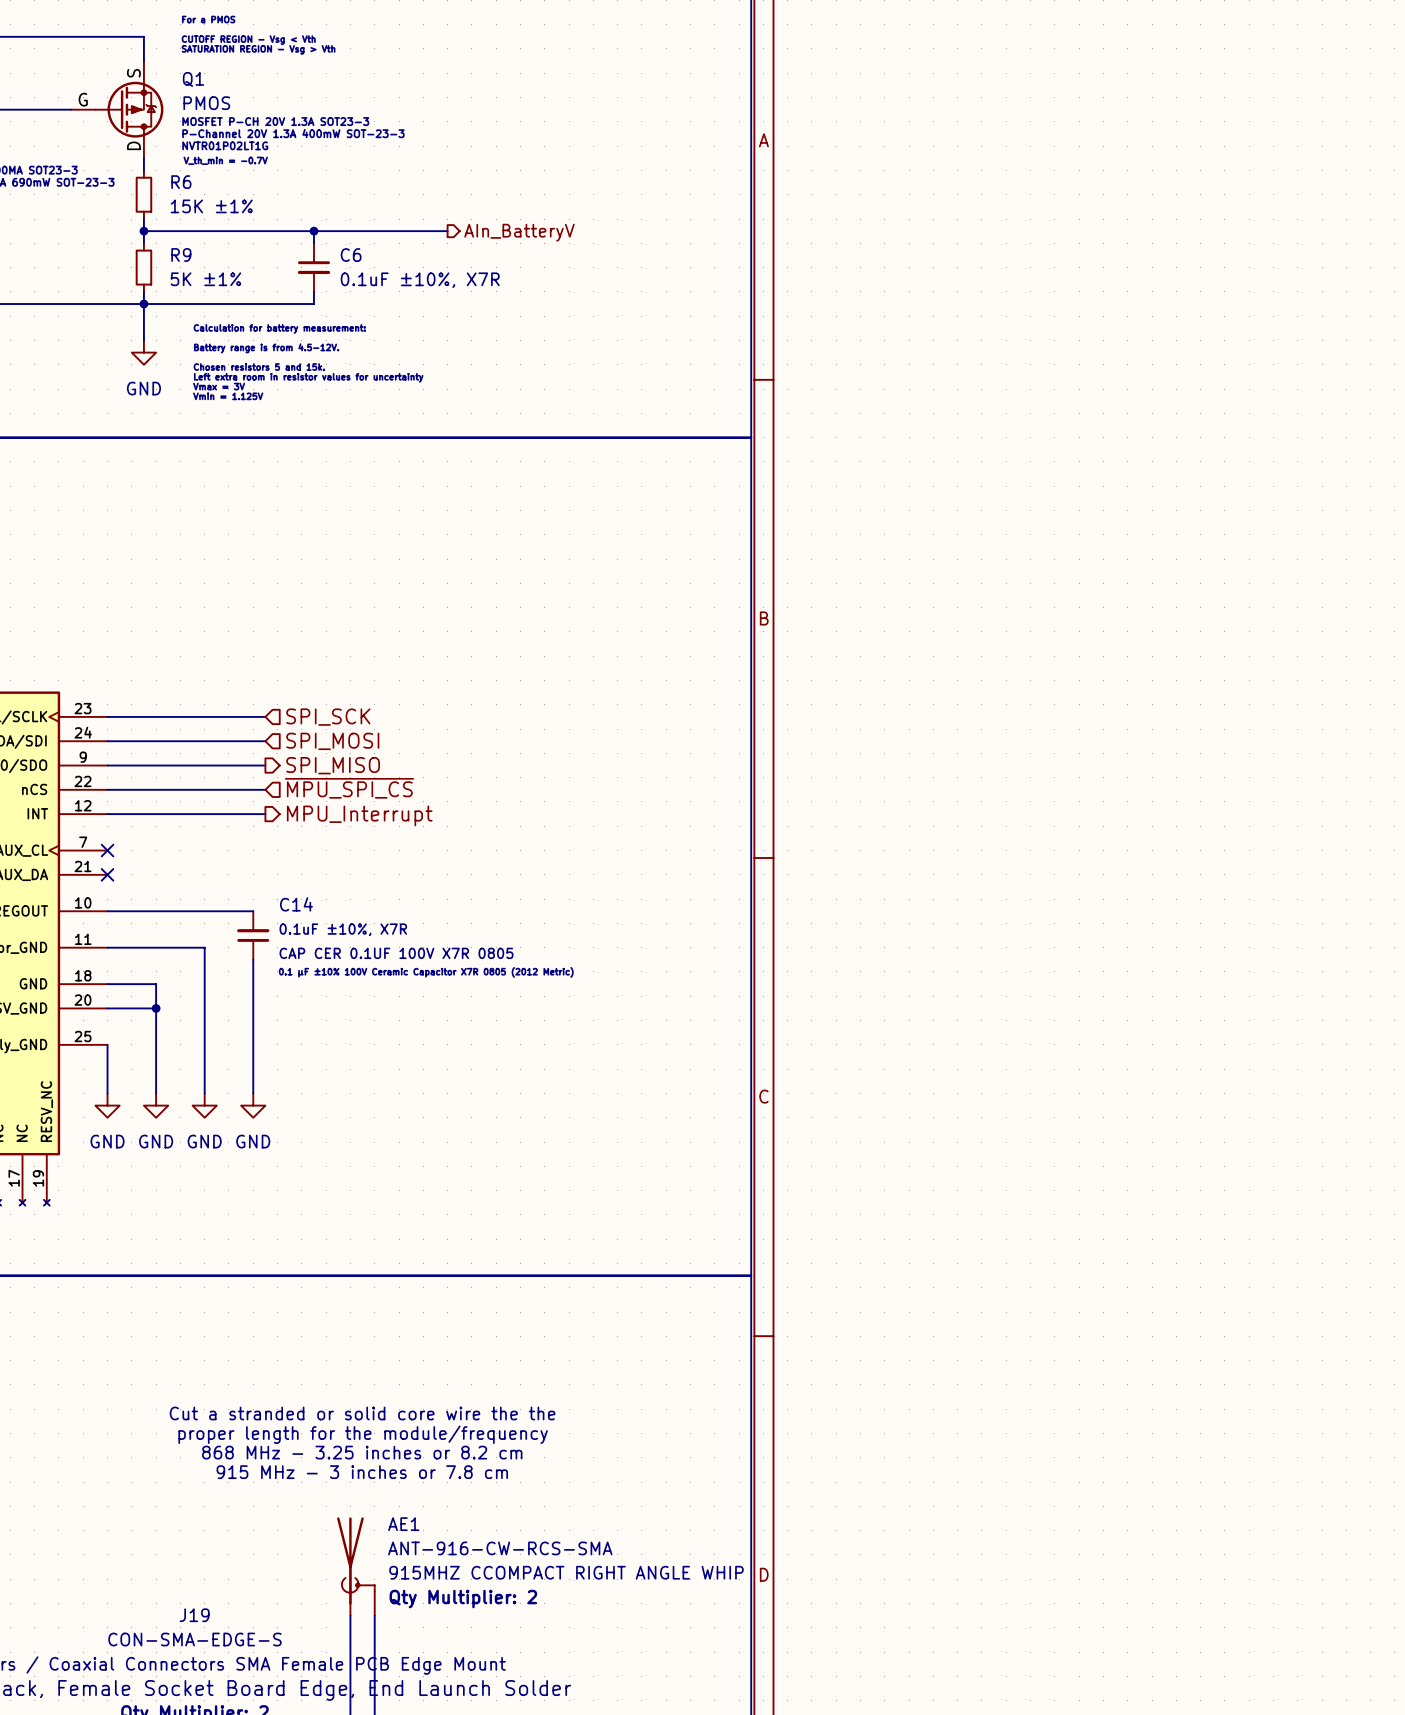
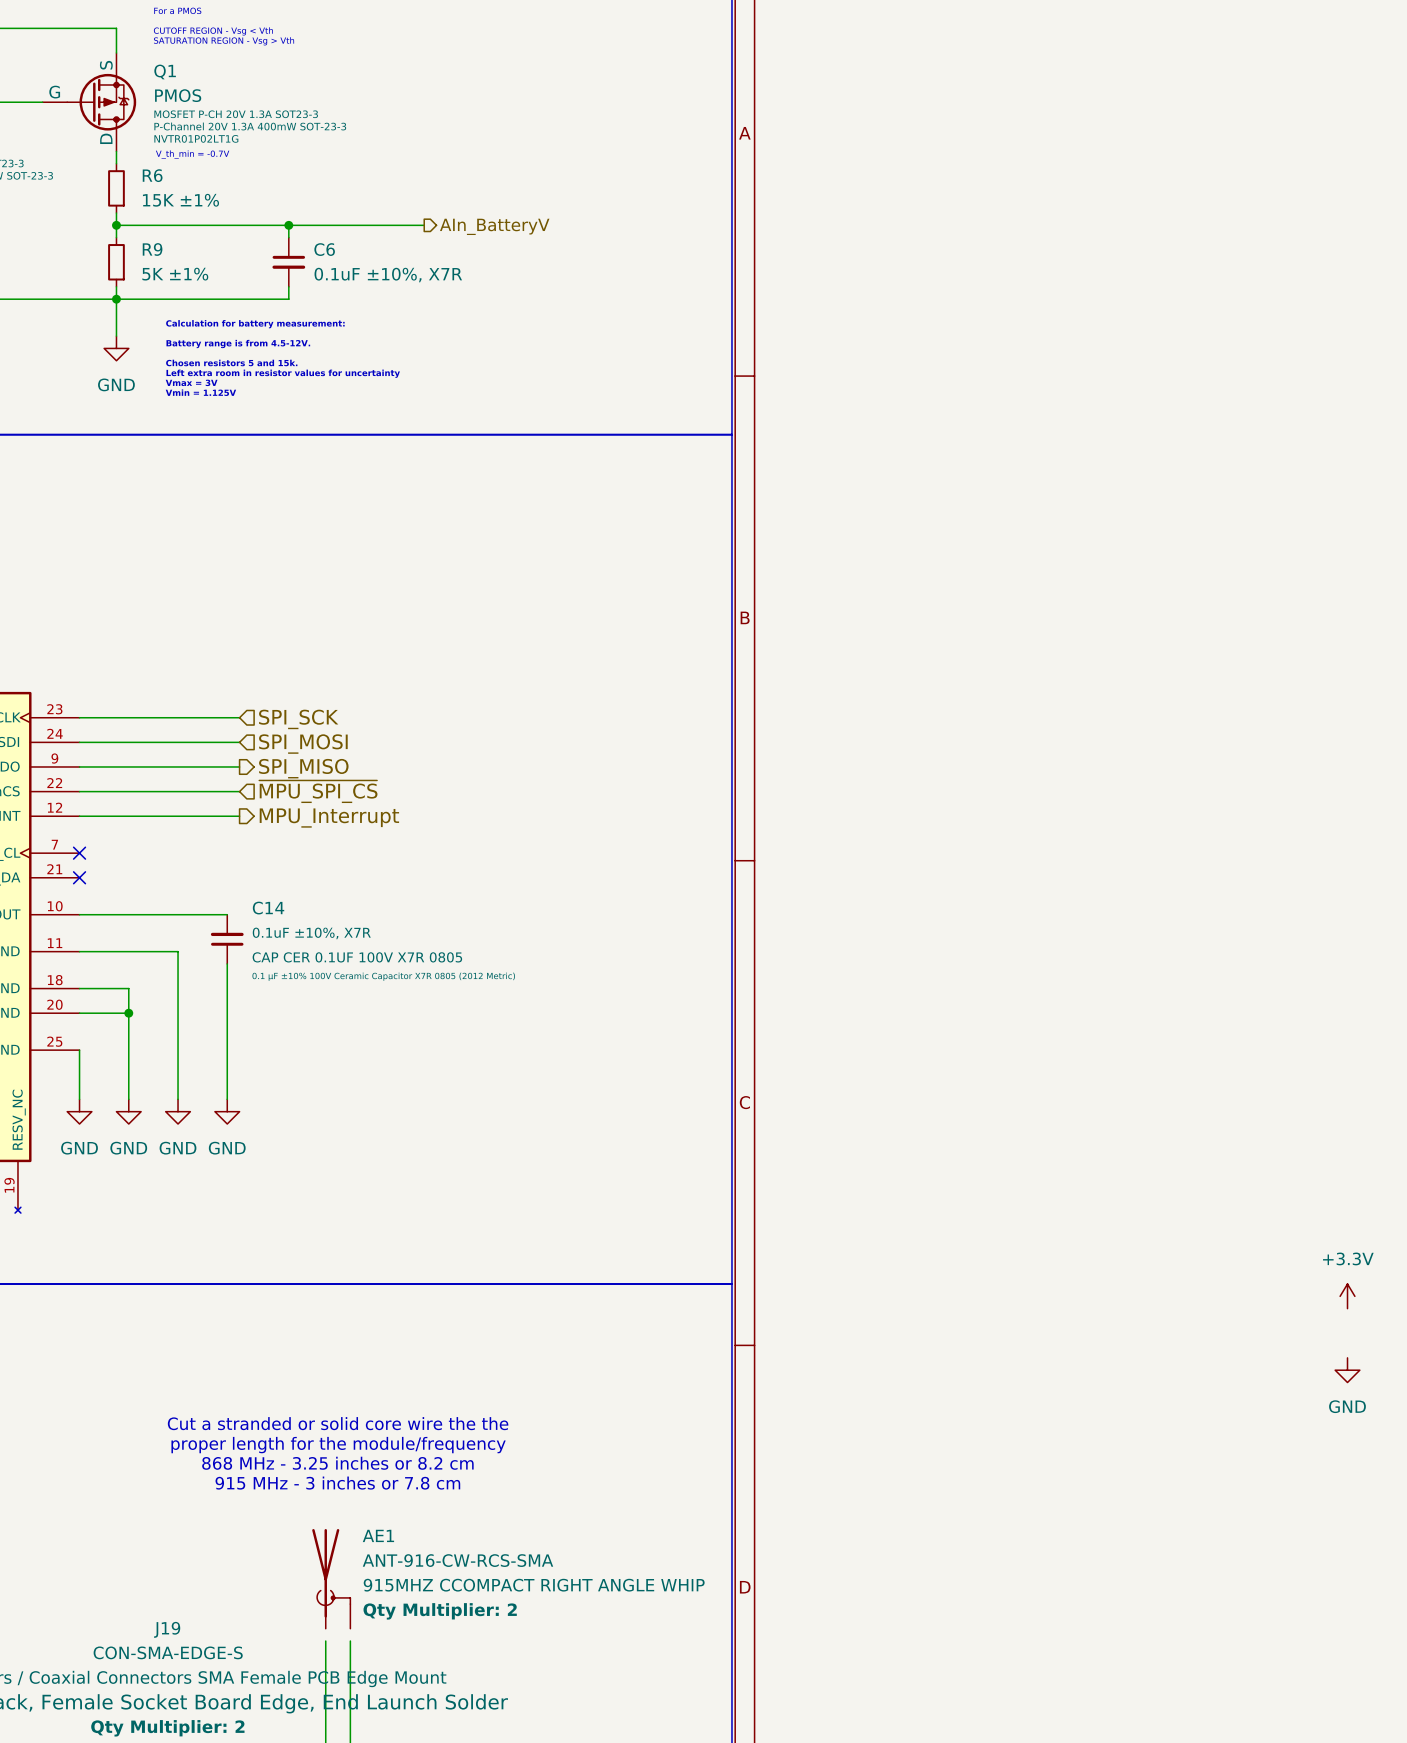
power symbol: none -> +3.3V (1347, 1296)
power symbol: none -> GND (1347, 1370)
wire: (350, 1615) (350, 1627) -> none
wire: (374, 1615) (374, 1627) -> none

